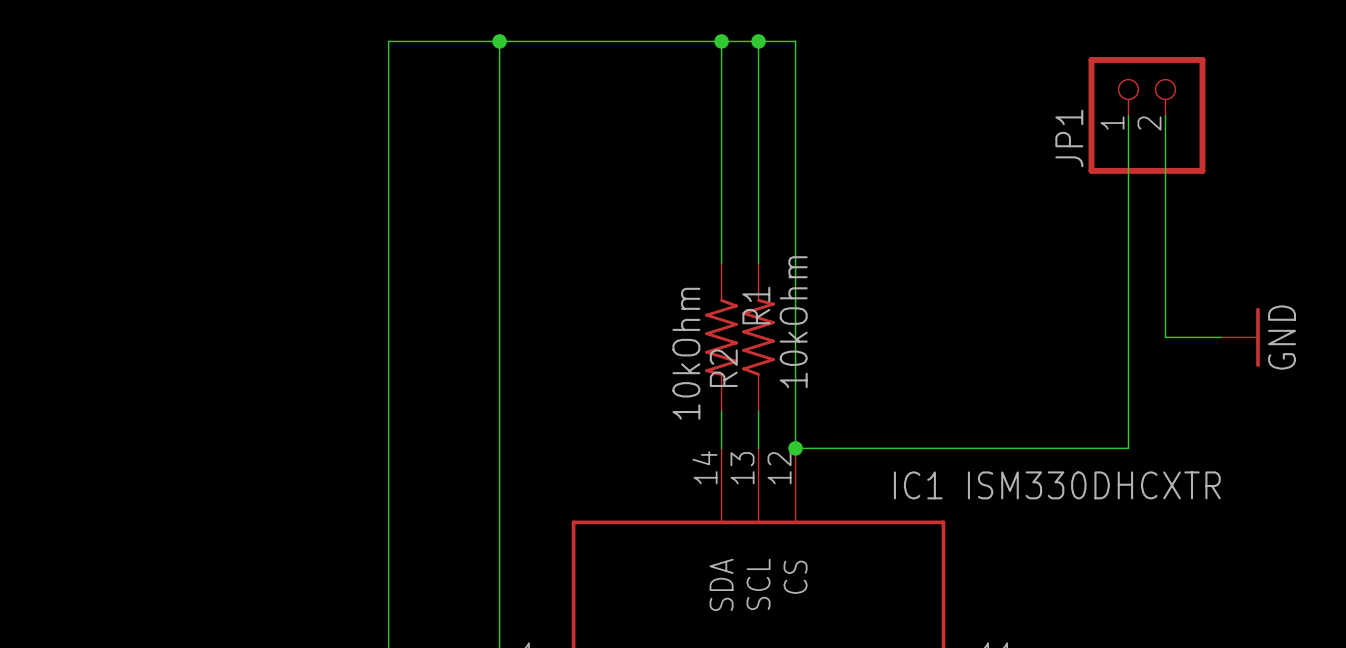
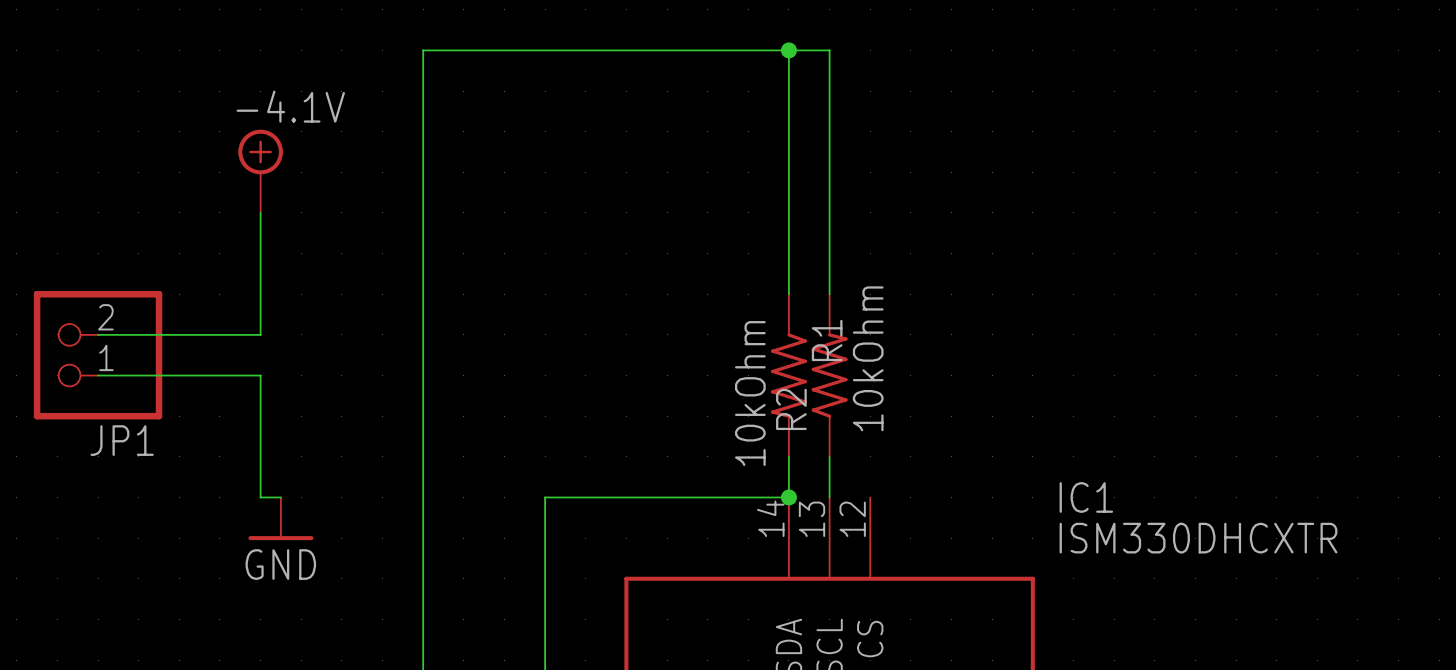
wire: (499, 41) (499, 448) -> (788, 497) (545, 497)
junction: (499, 41) -> none
wire: (758, 41) (795, 41) (795, 448) (1128, 448) (1128, 115) -> none
junction: (758, 41) -> none
JP1 rotation: 0° (1146, 115) -> 90° counterclockwise (98, 355)
JP1 position: (1146, 115) -> (98, 355)
wire: (1165, 115) (1165, 337) (1220, 337) -> none
power symbol: none -> -4.1V (260, 171)
wire: none -> (260, 212) (260, 334) (98, 334)
wire: none -> (98, 375) (260, 375) (260, 497) (280, 497)
power symbol: GND (1240, 337) -> none
junction position: (795, 448) -> (788, 497)
power symbol: none -> GND (280, 518)
IC1 name position: IC1 (918, 485) -> IC1 (1086, 497)

